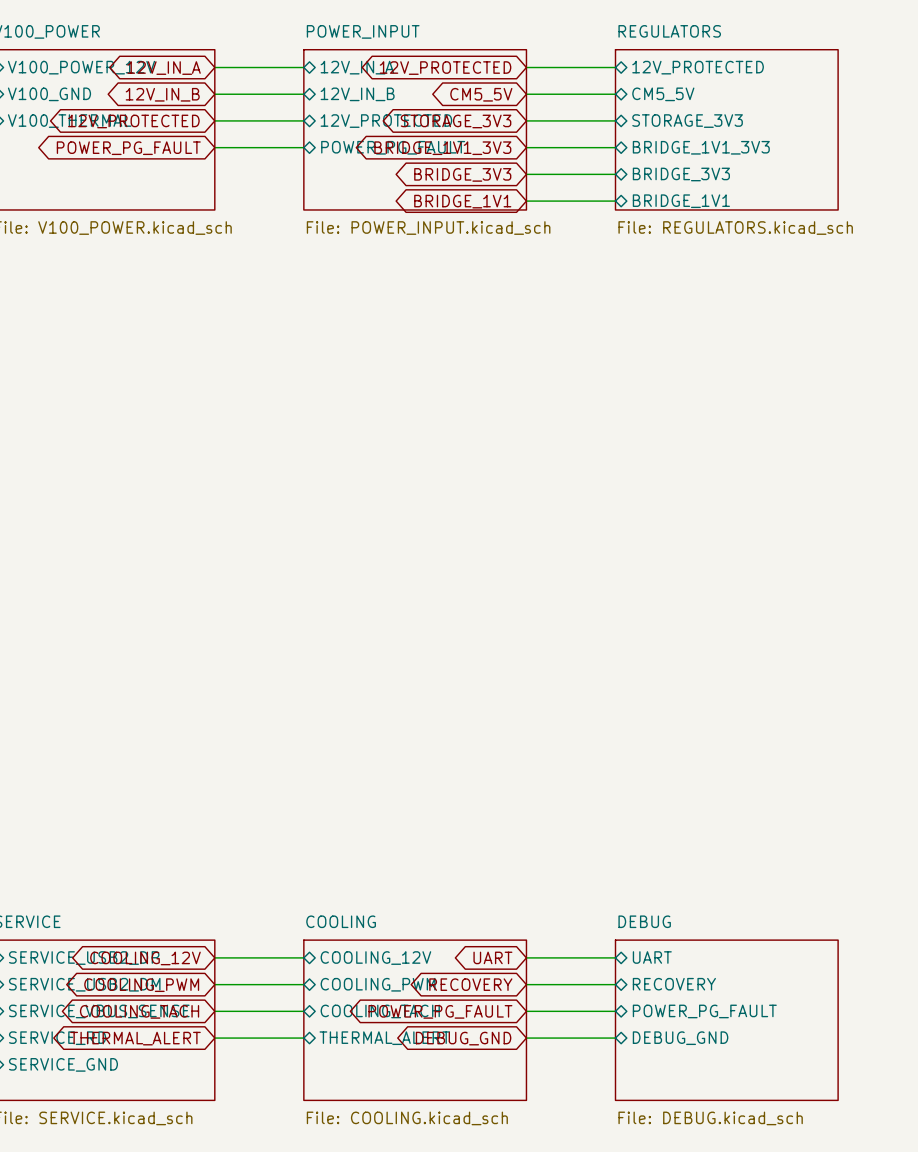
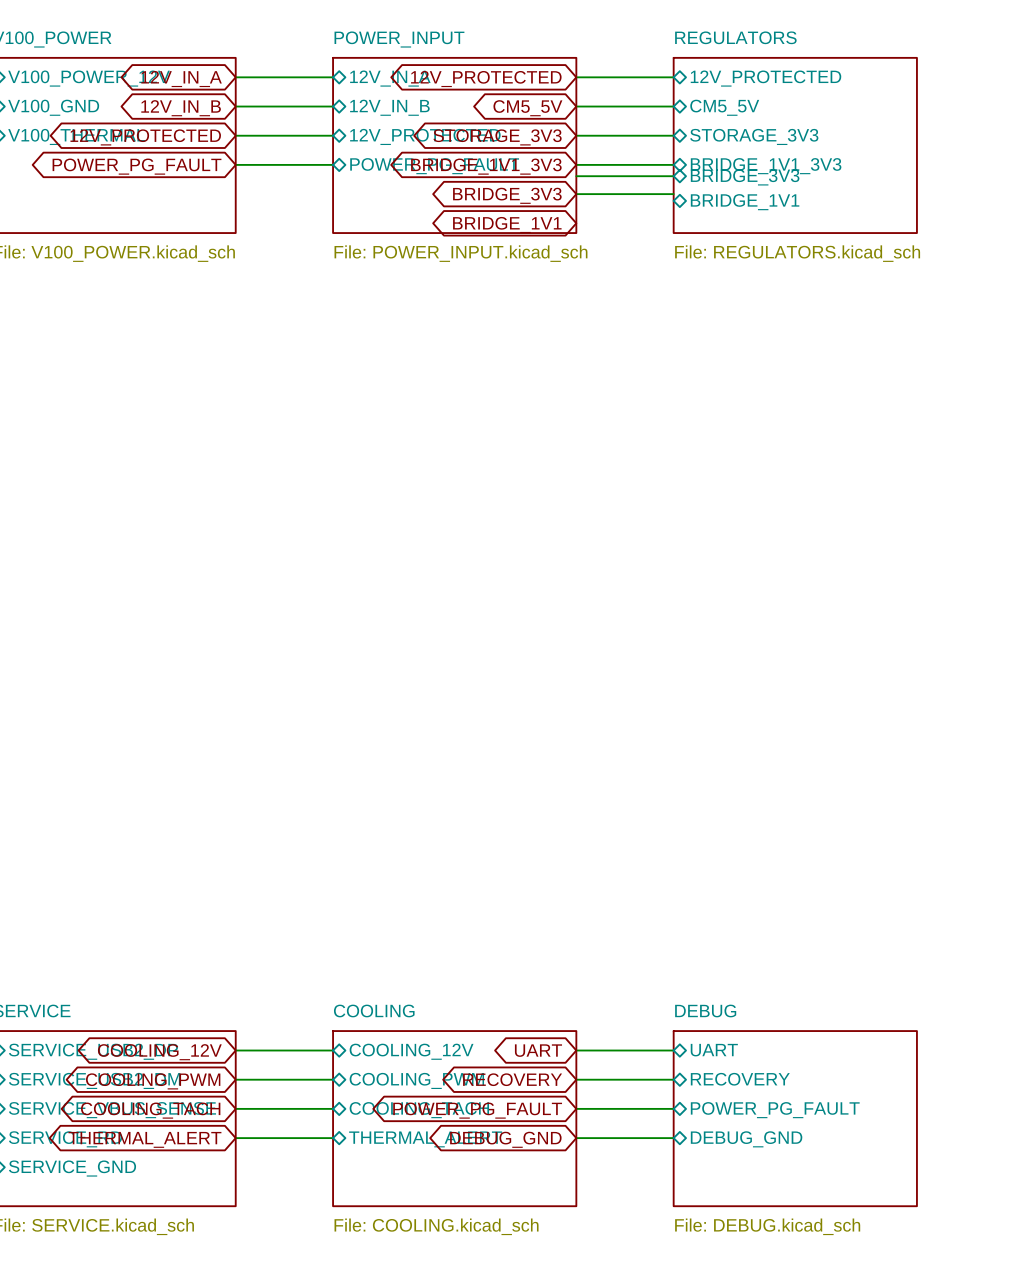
sheet pin position: BRIDGE_3V3 (681, 174) -> BRIDGE_3V3 (745, 177)
wire: (526, 201) (615, 201) -> (576, 176) (673, 176)
sheet pin position: BRIDGE_1V1 (681, 201) -> BRIDGE_1V1 (745, 202)

